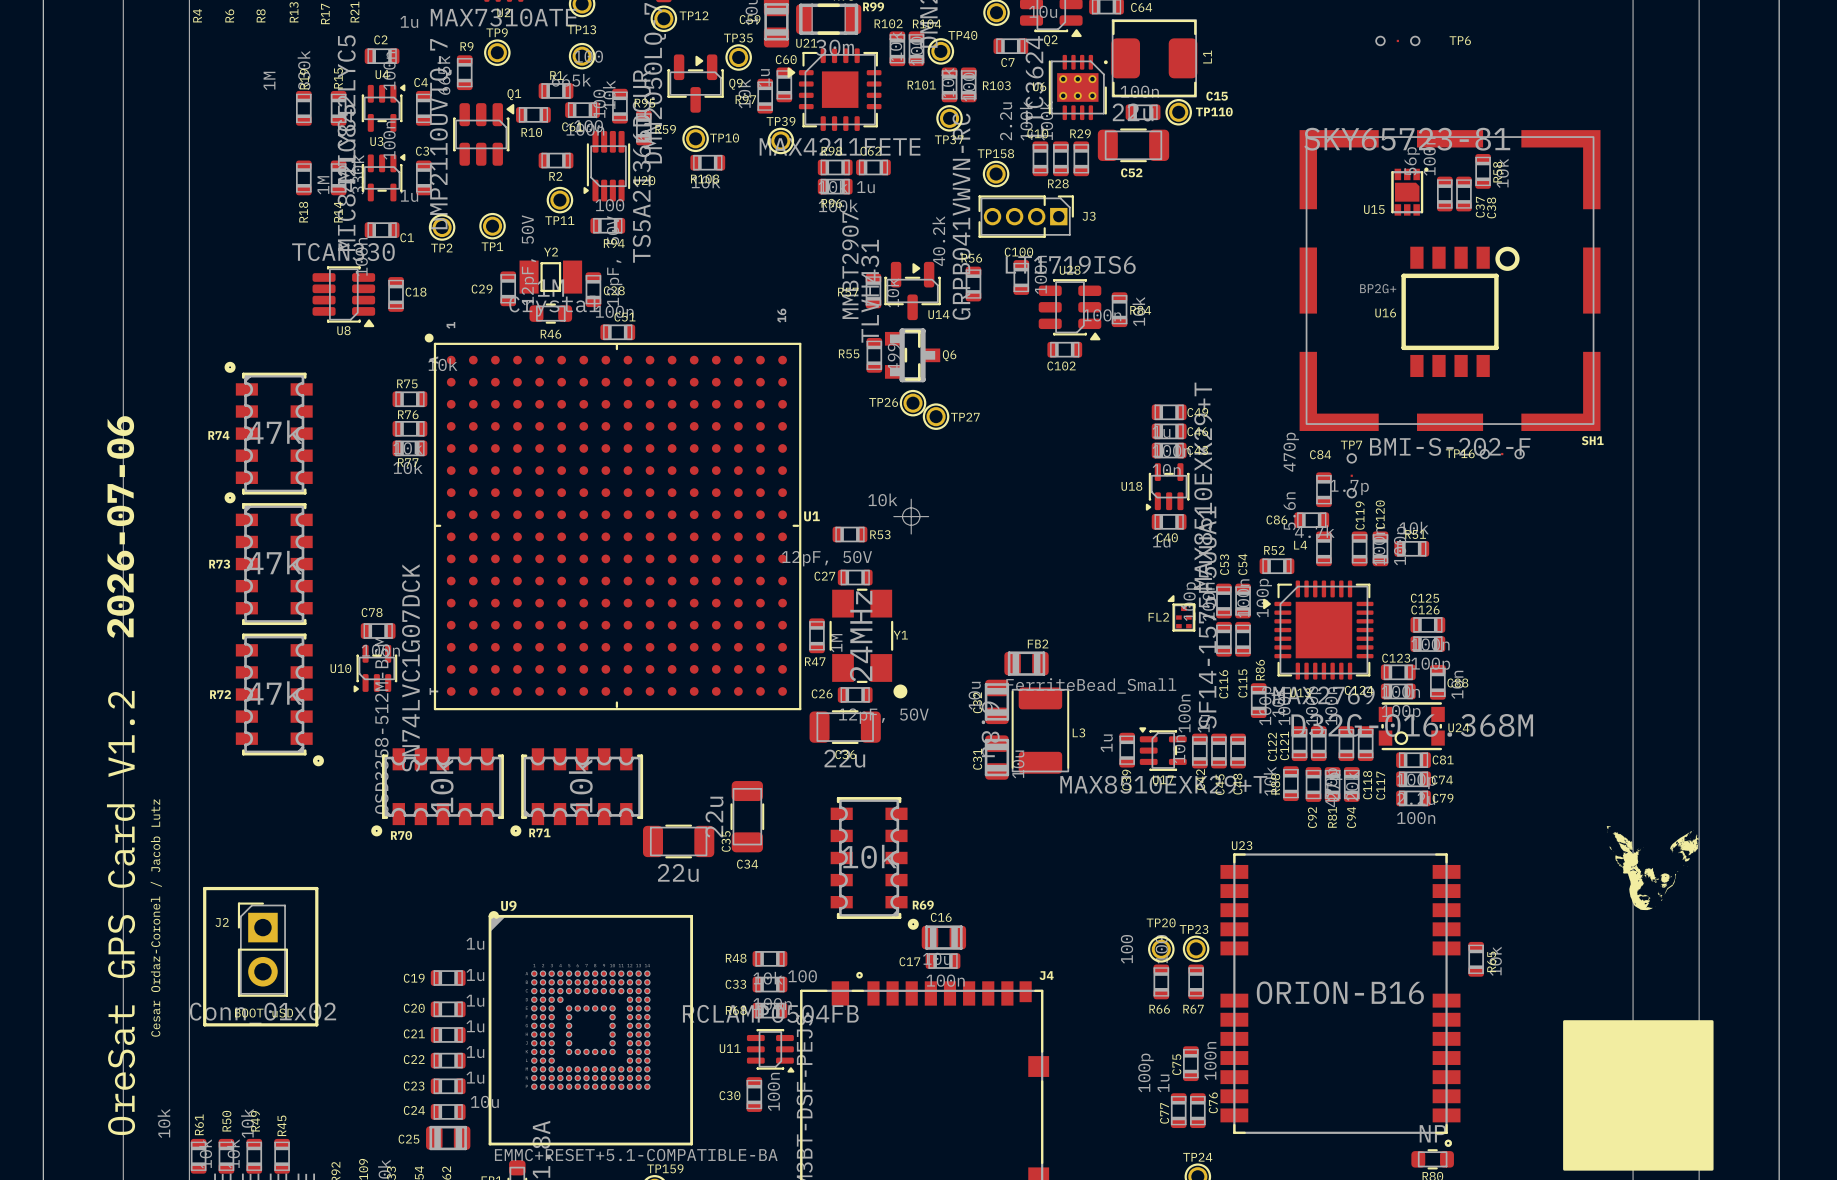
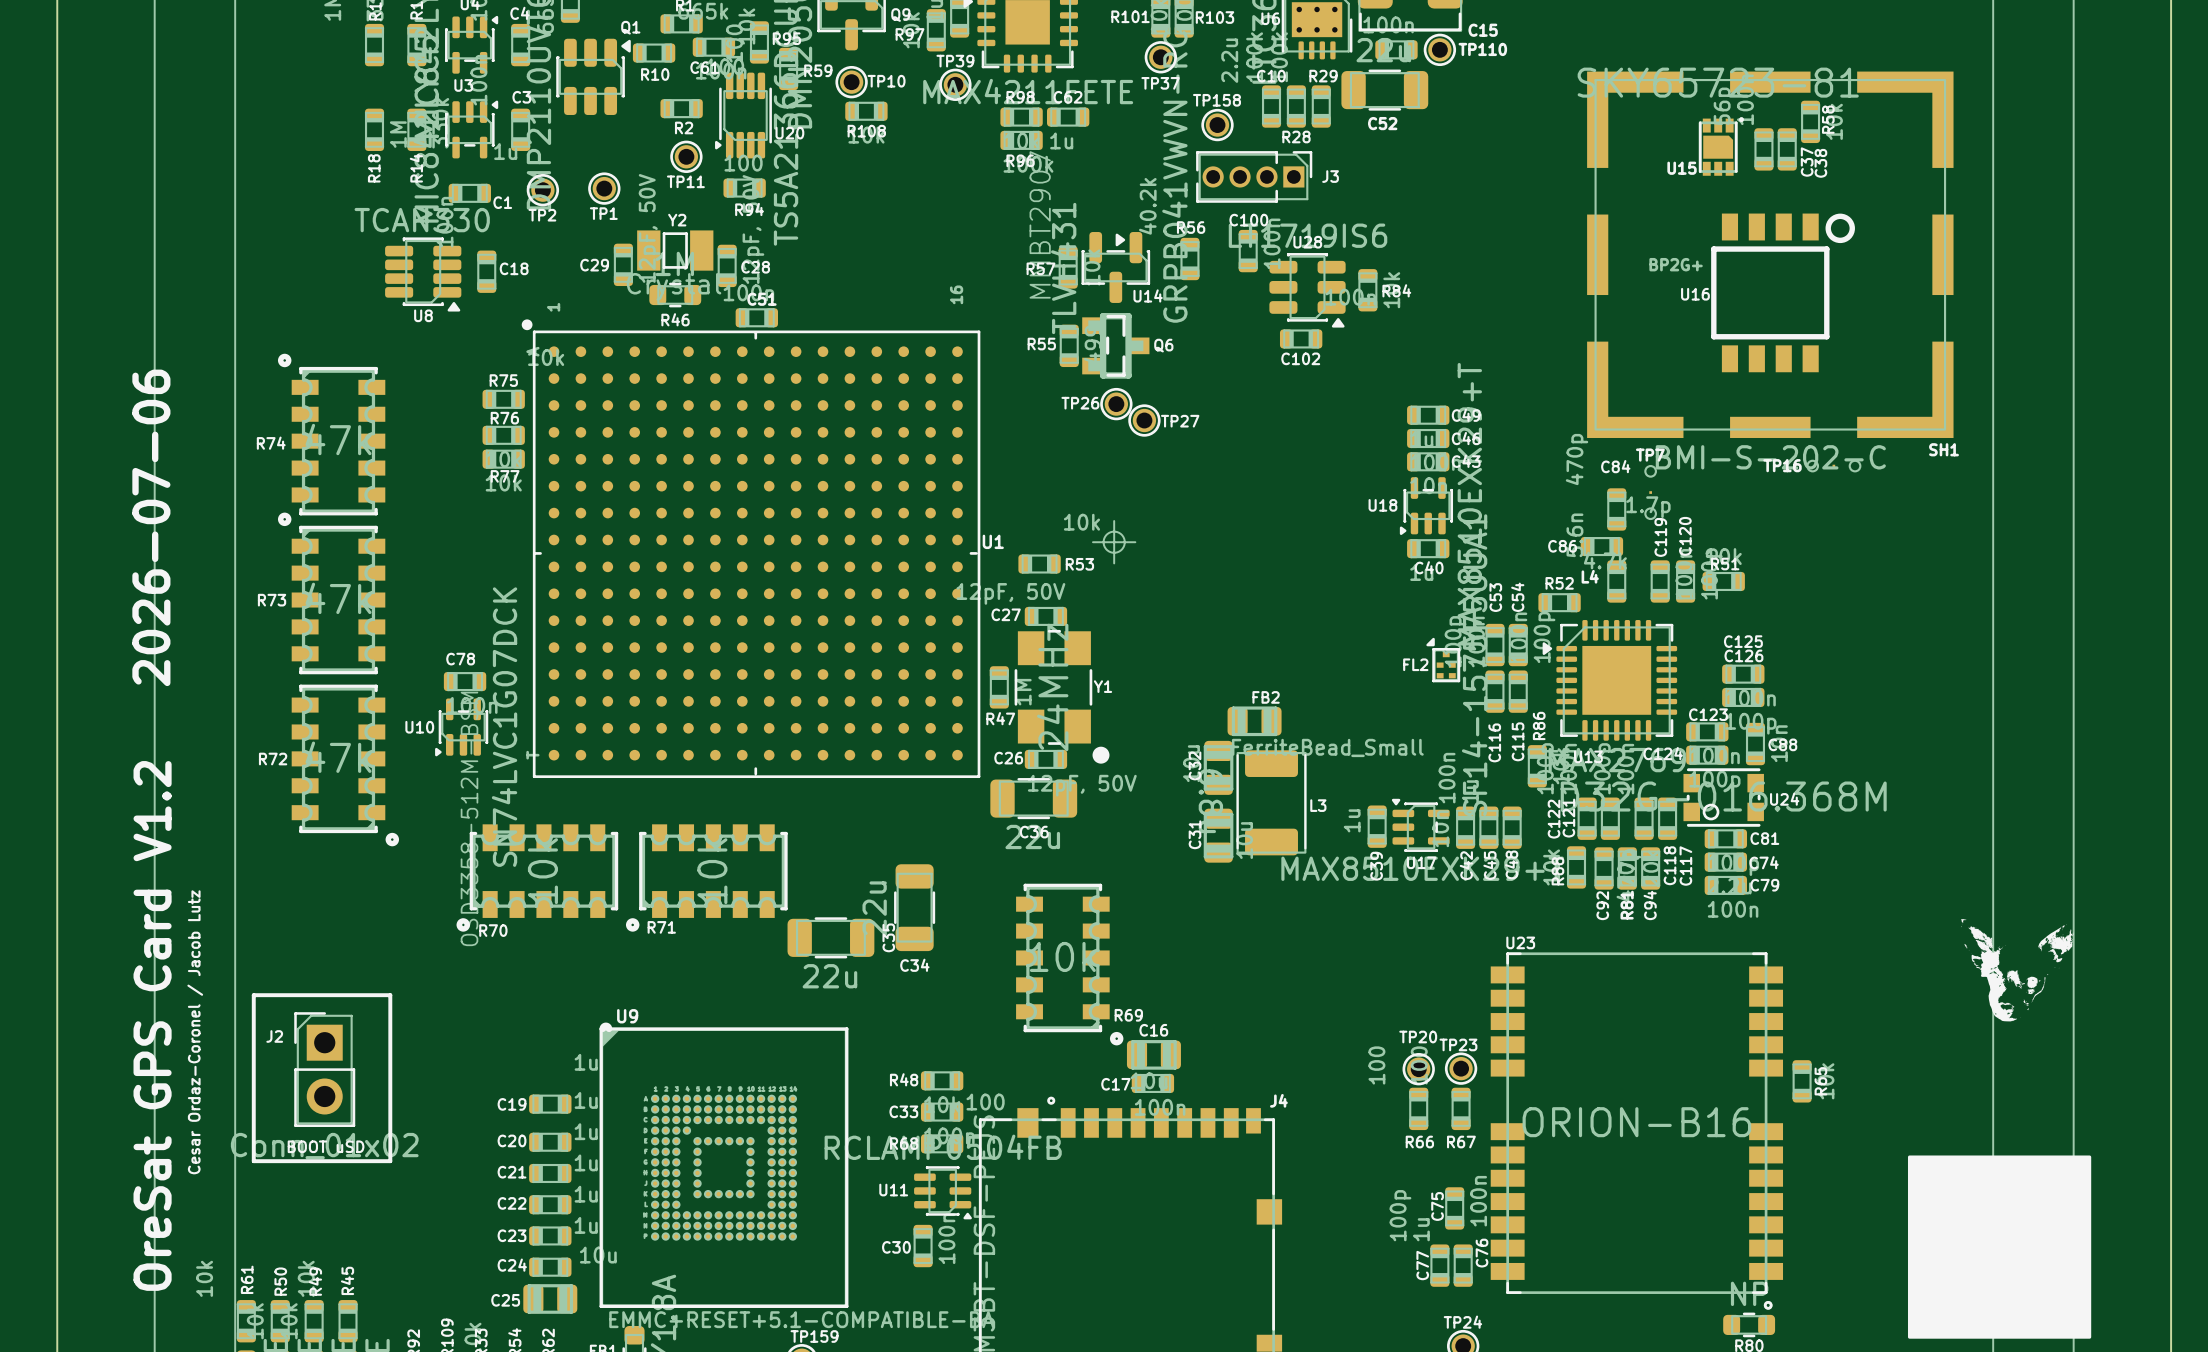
SH1 value: BMI-S-202-F (1450, 446) -> BMI-S-202-C (1770, 457)

